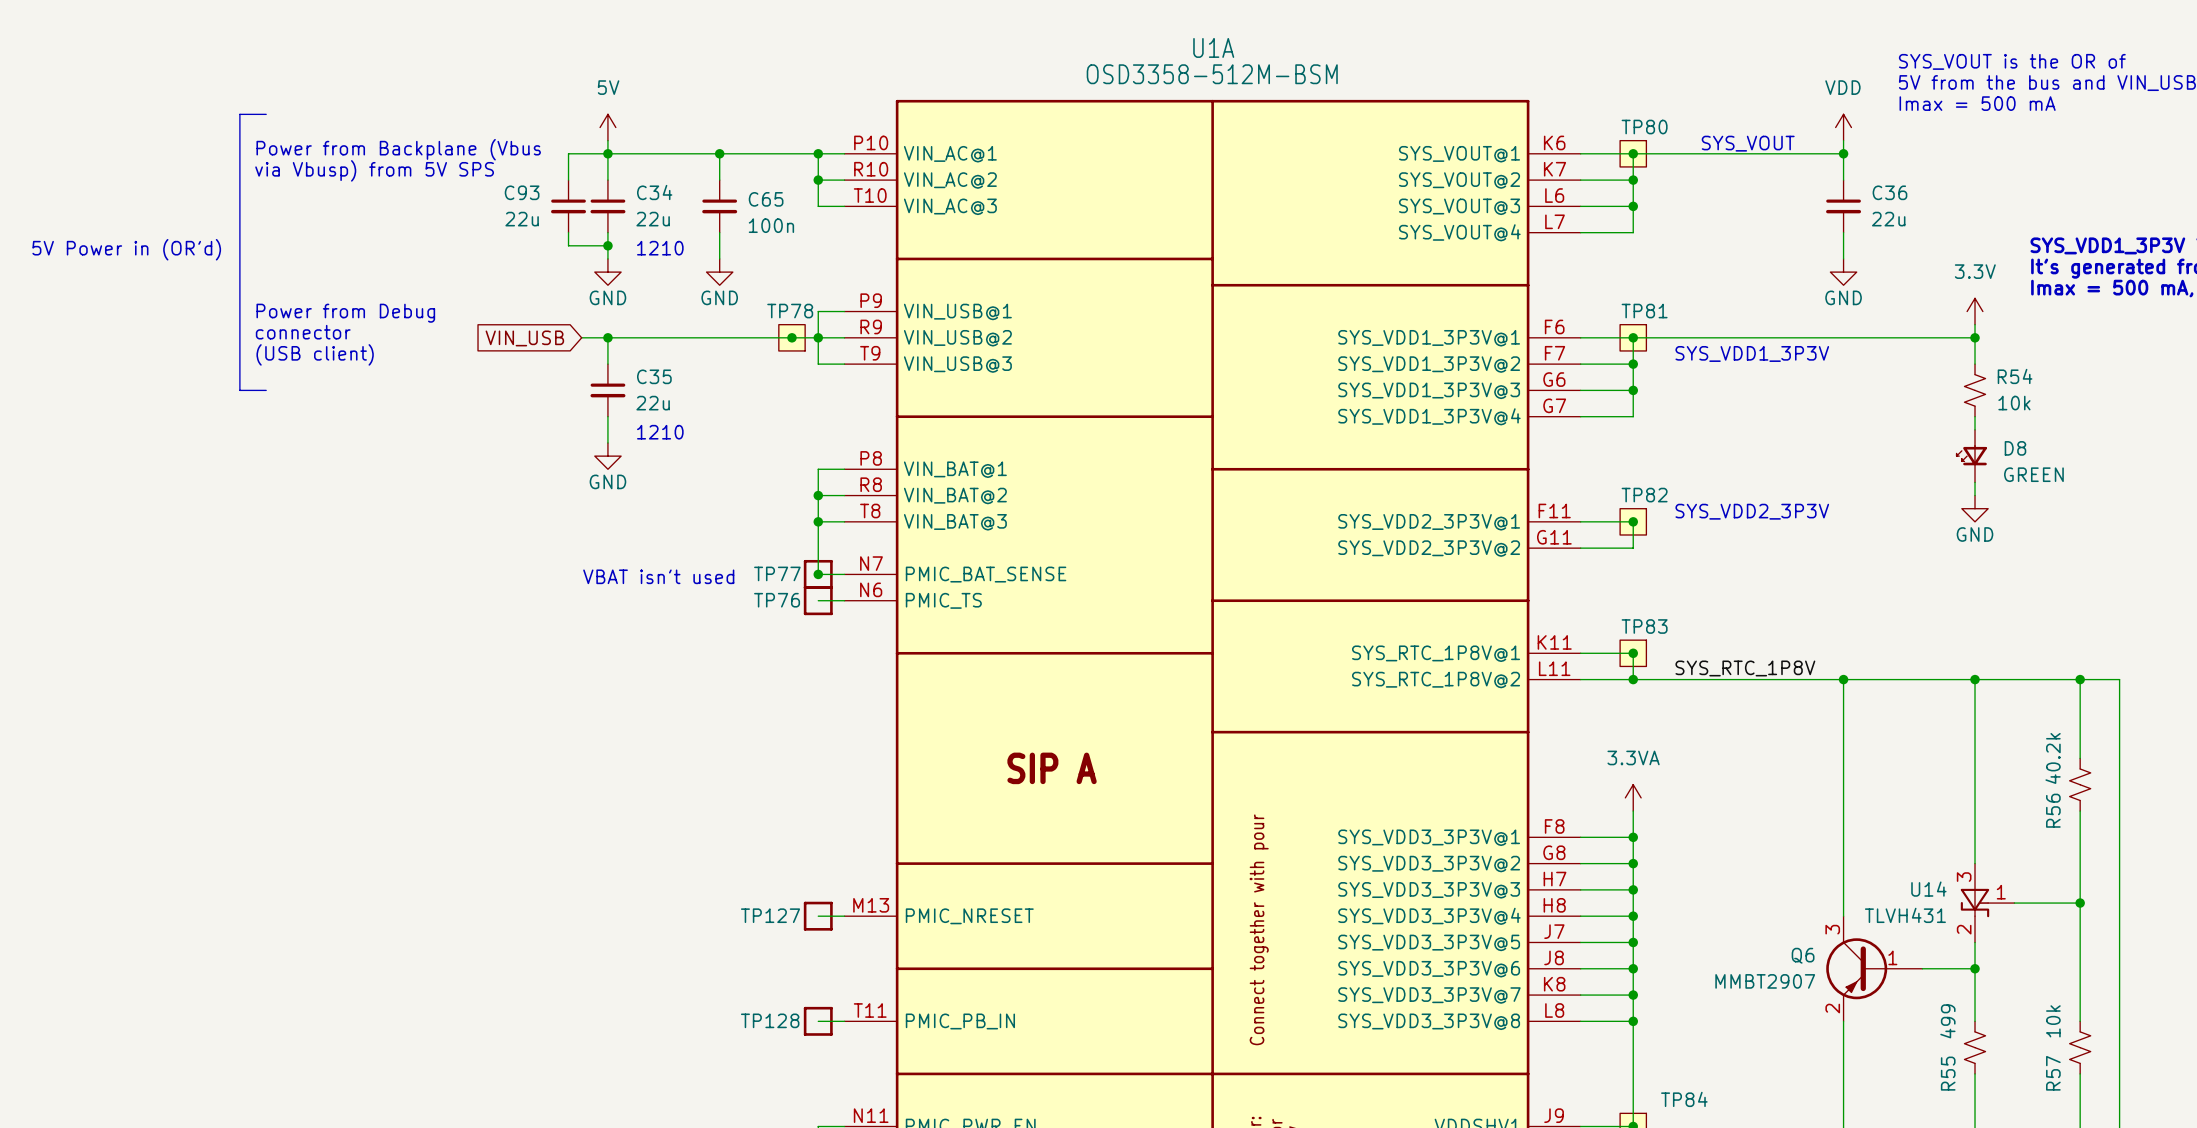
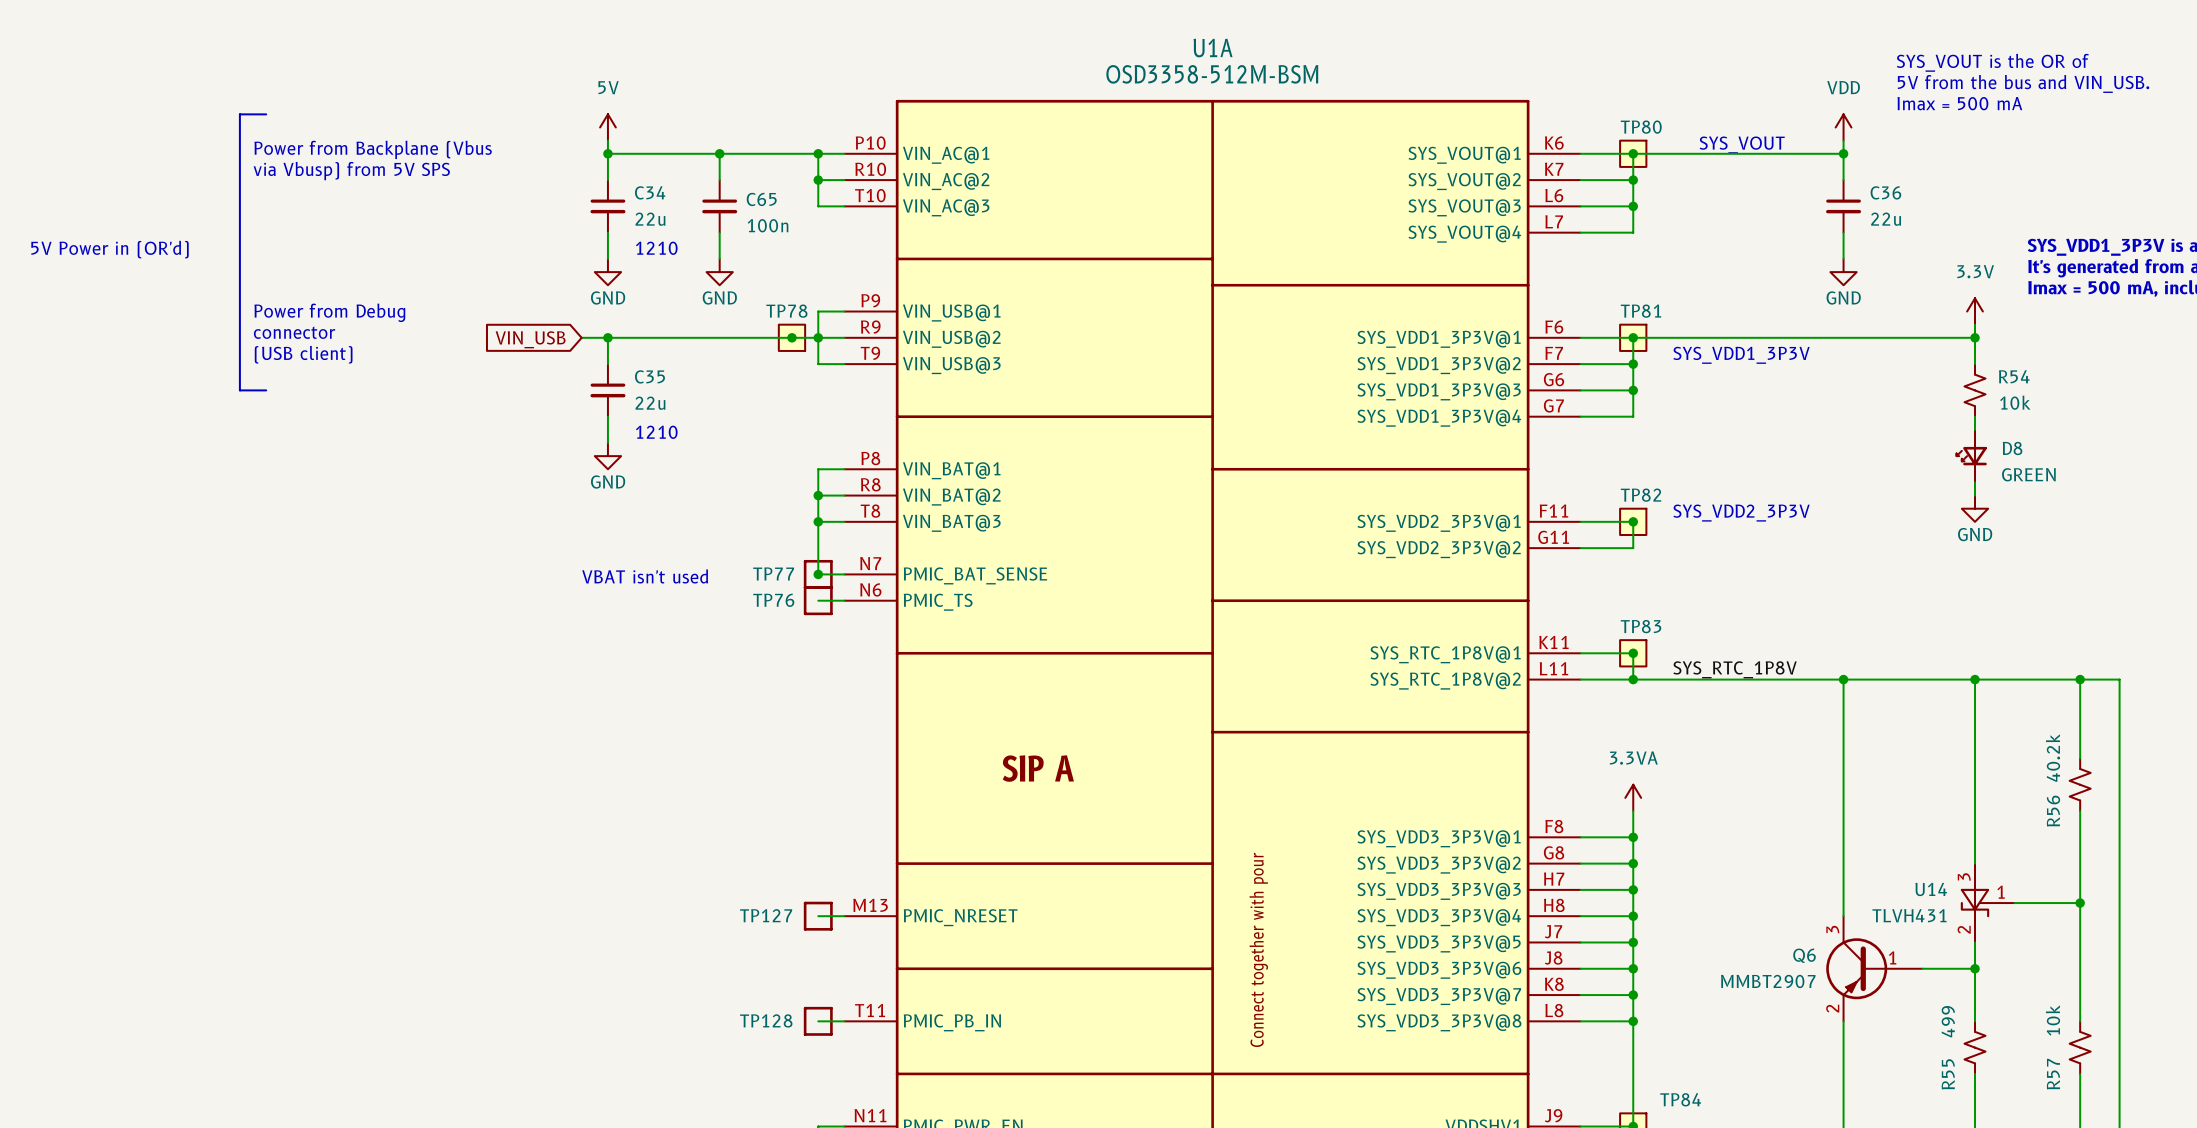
wire: (607, 153) (568, 153) (568, 180) -> none
C93: 22u (568, 206) -> none
wire: (568, 232) (568, 245) (607, 245) -> none
junction: (607, 245) -> none

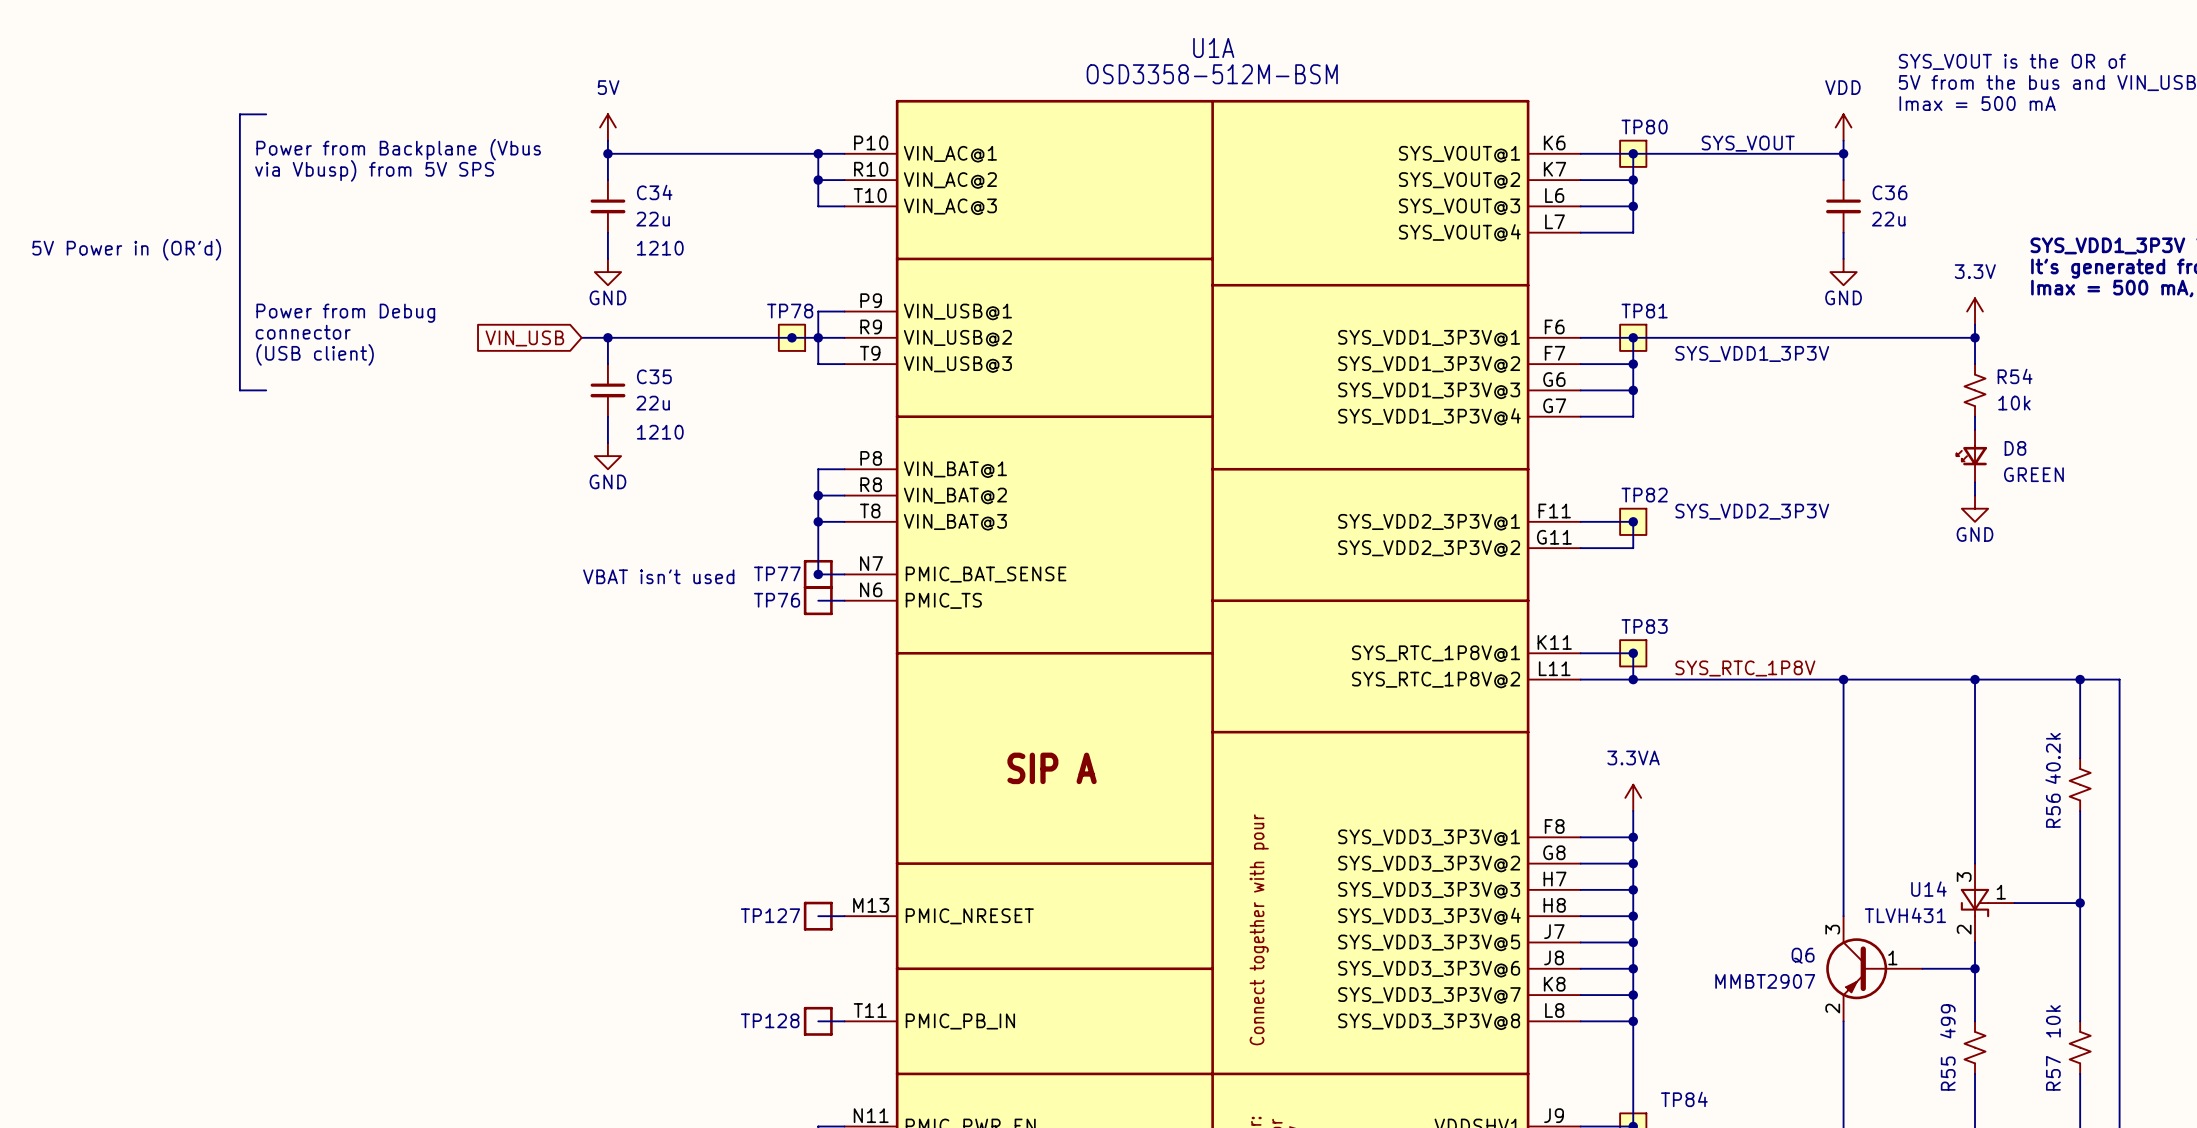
wire: (719, 153) (719, 180) -> none
junction: (719, 153) -> none
C65: 100n (719, 206) -> none
wire: (719, 232) (719, 258) -> none
power symbol: GND (719, 272) -> none

